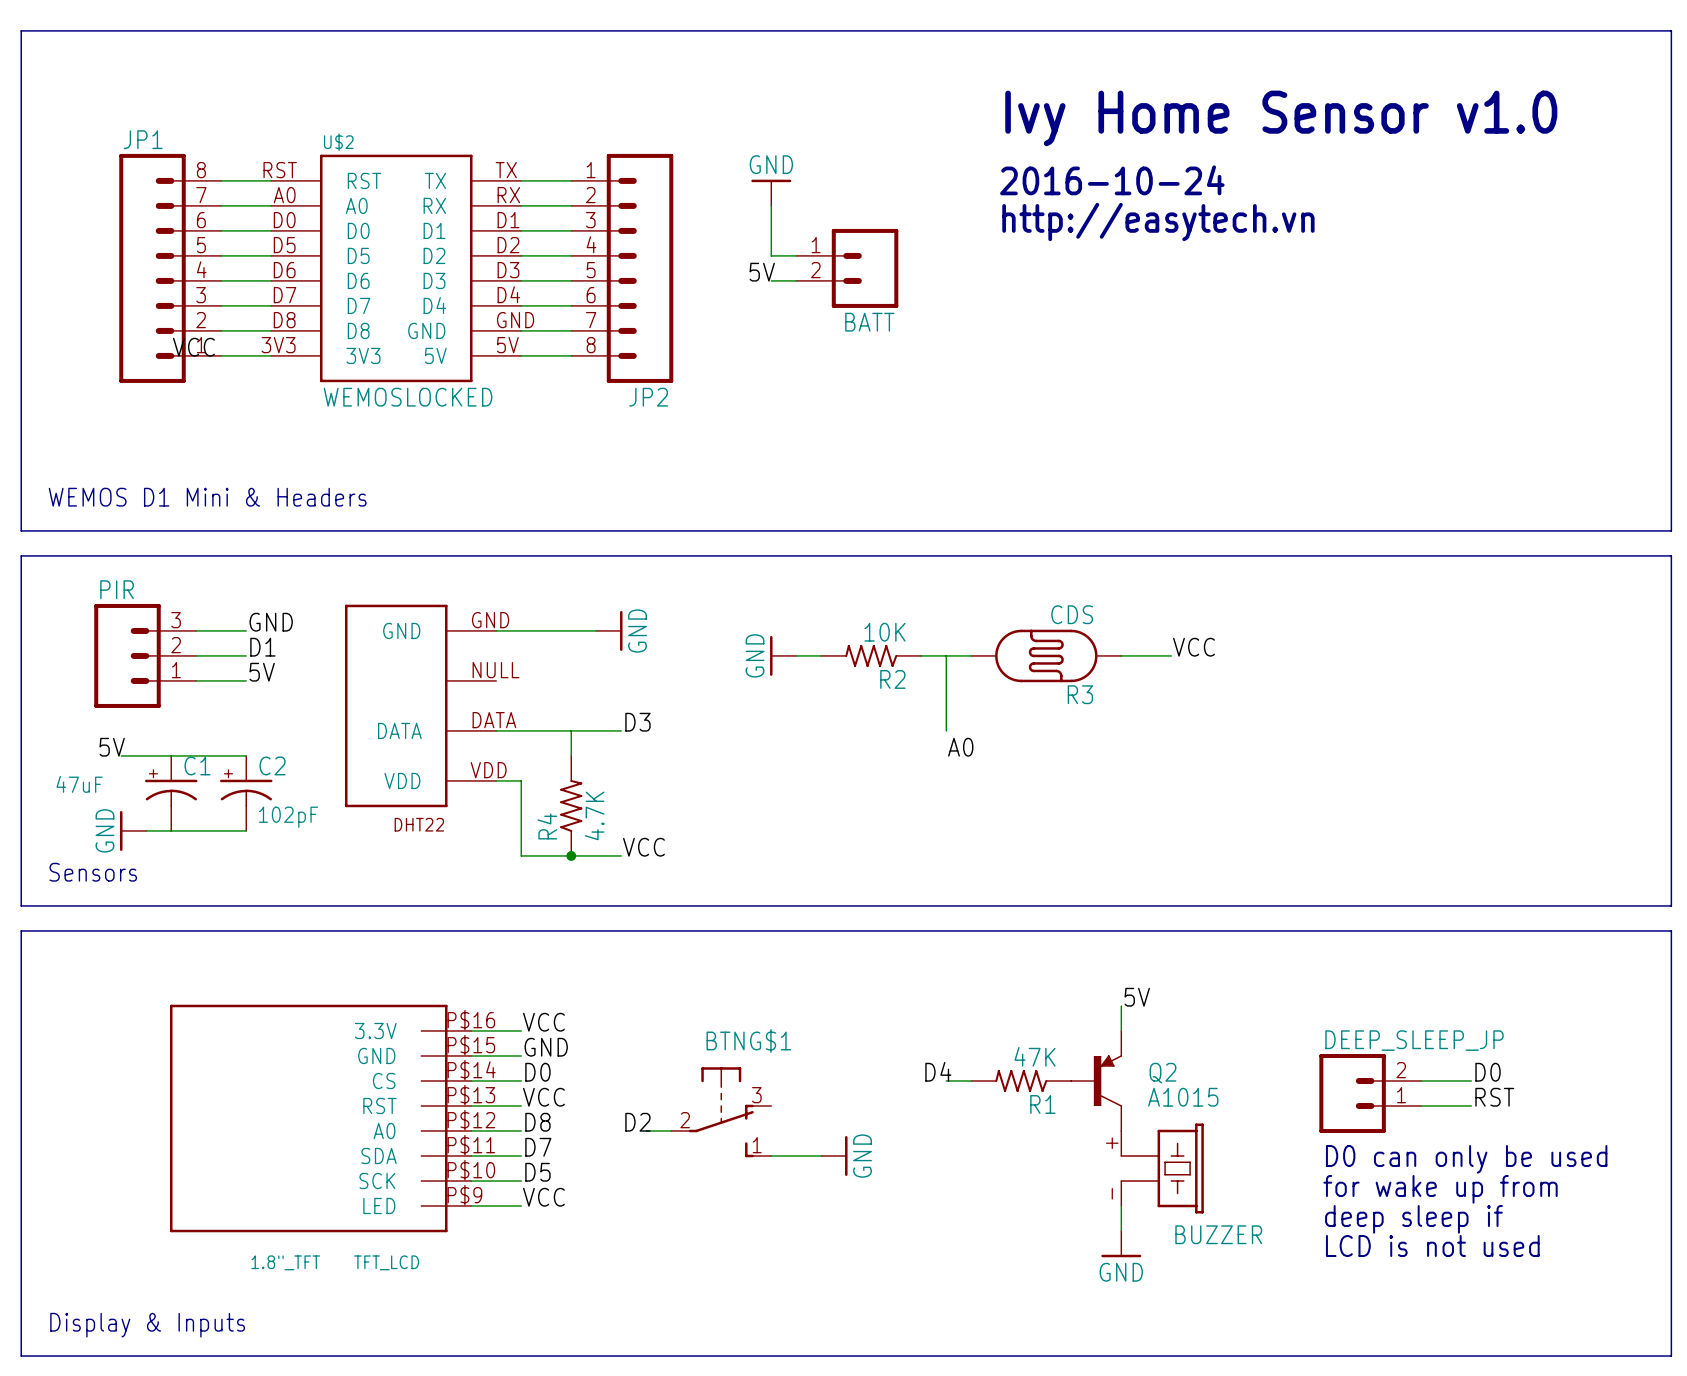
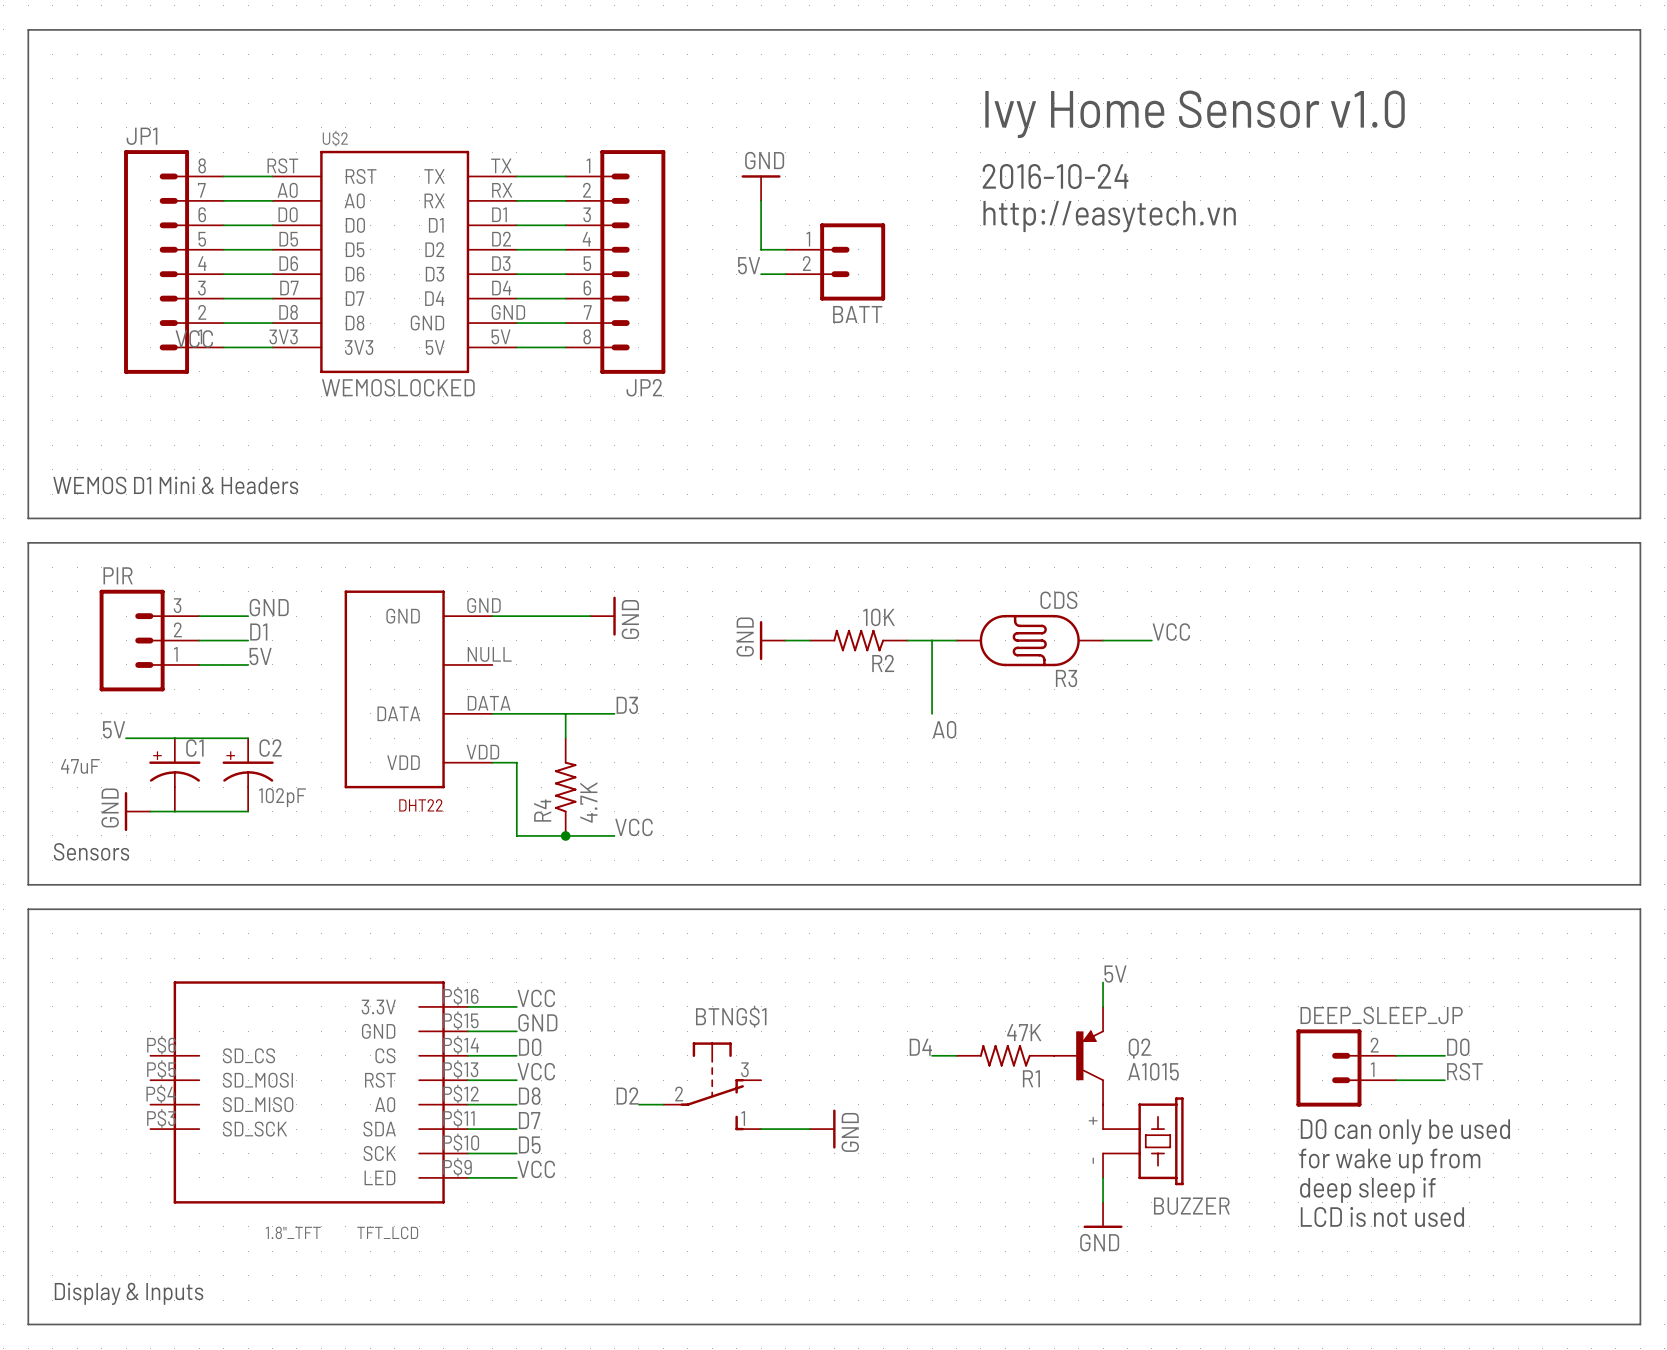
TFT_LCD: none -> 1.8"_TFT (309, 1092)
TFT_LCD: 1.8"_TFT (320, 1118) -> none

